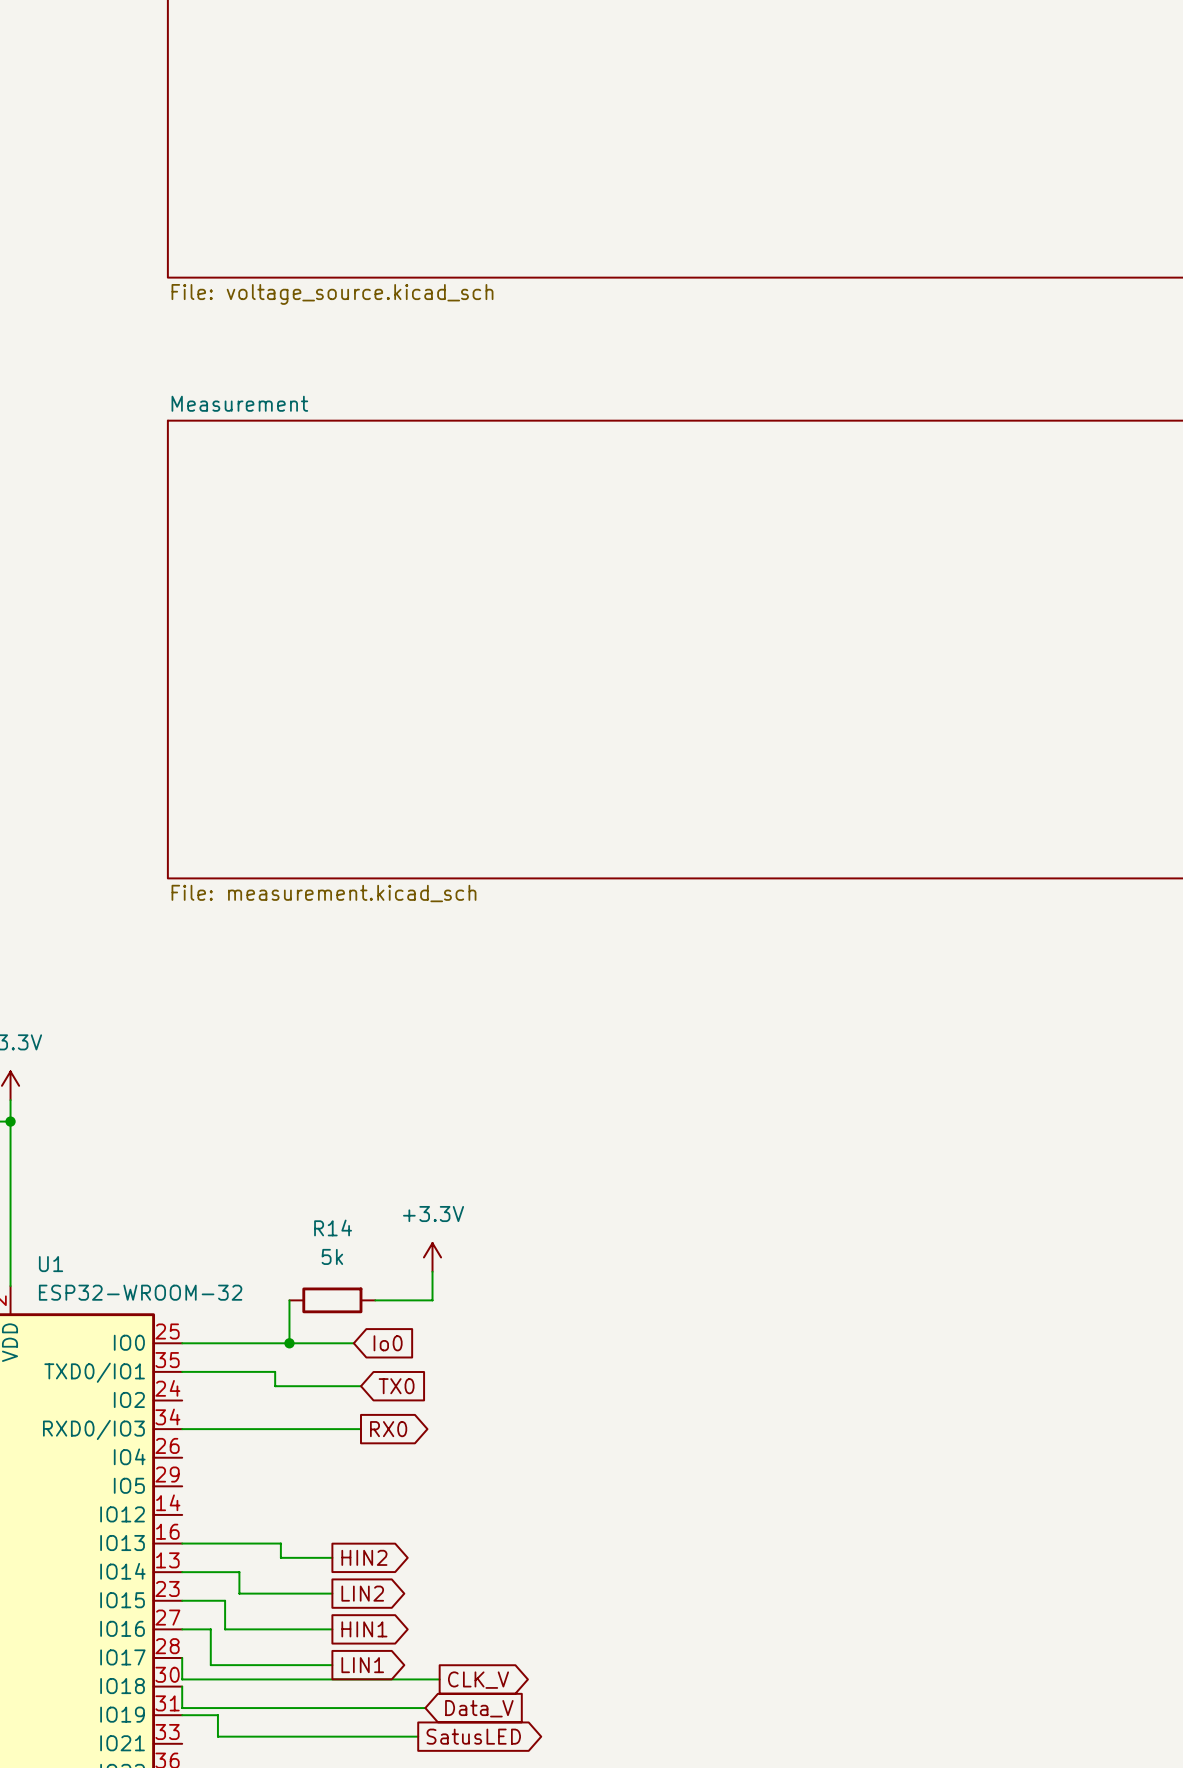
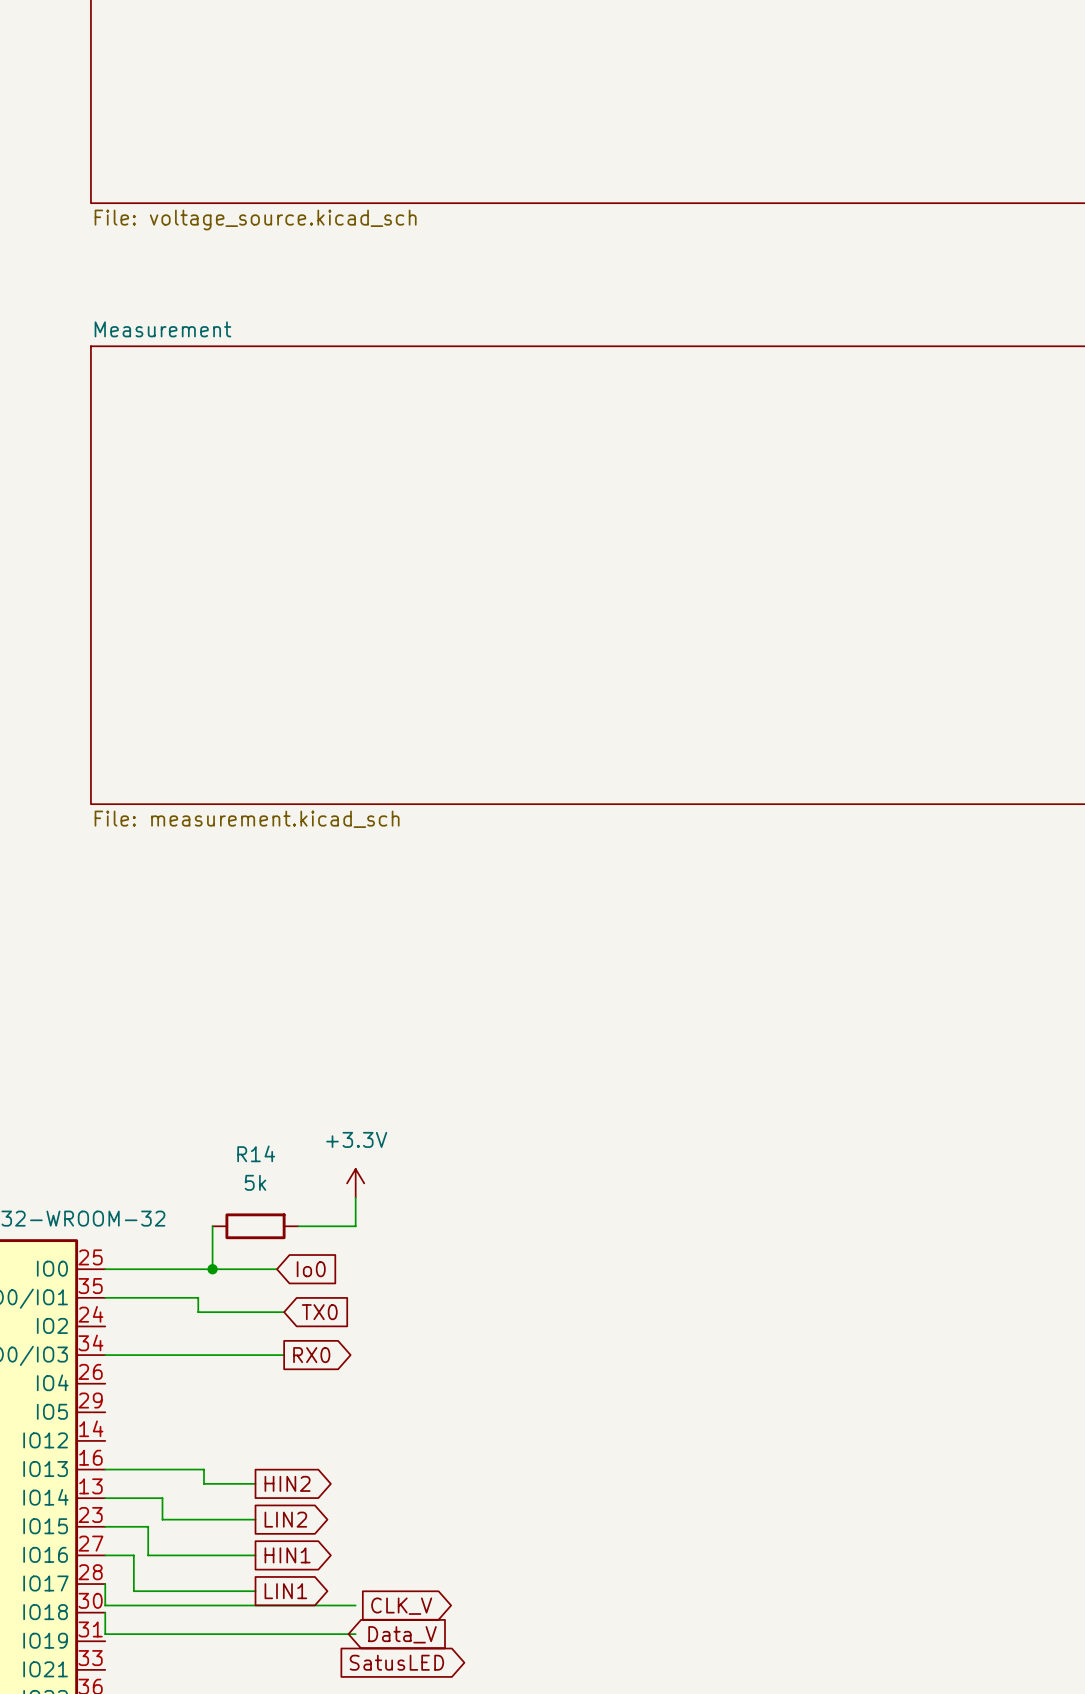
wire: (432, 1679) (439, 1679) -> (348, 1634) (355, 1634)
wire: (182, 1715) (217, 1715) (217, 1736) (418, 1736) -> none

